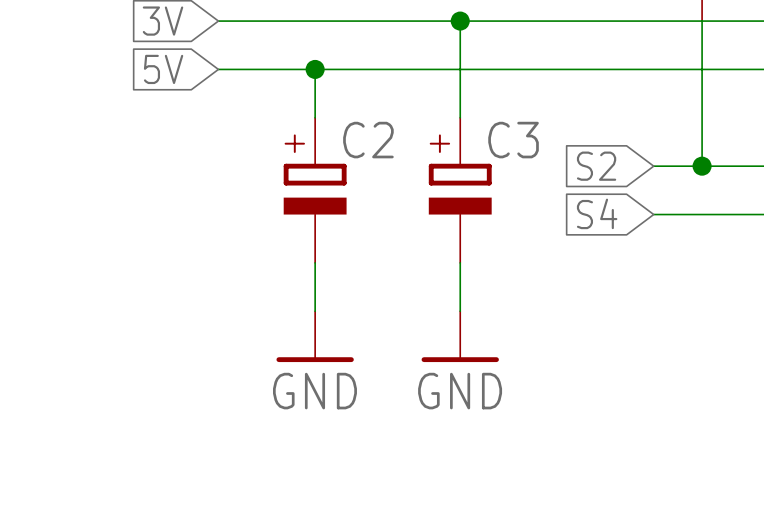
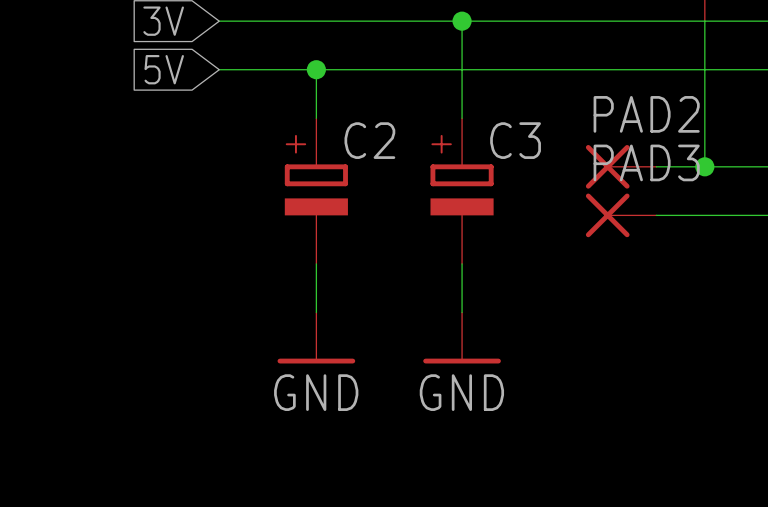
global label: S2 (596, 166) -> none
PAD2: none -> (621, 166)
global label: S4 (597, 213) -> none
PAD3: none -> (621, 215)

